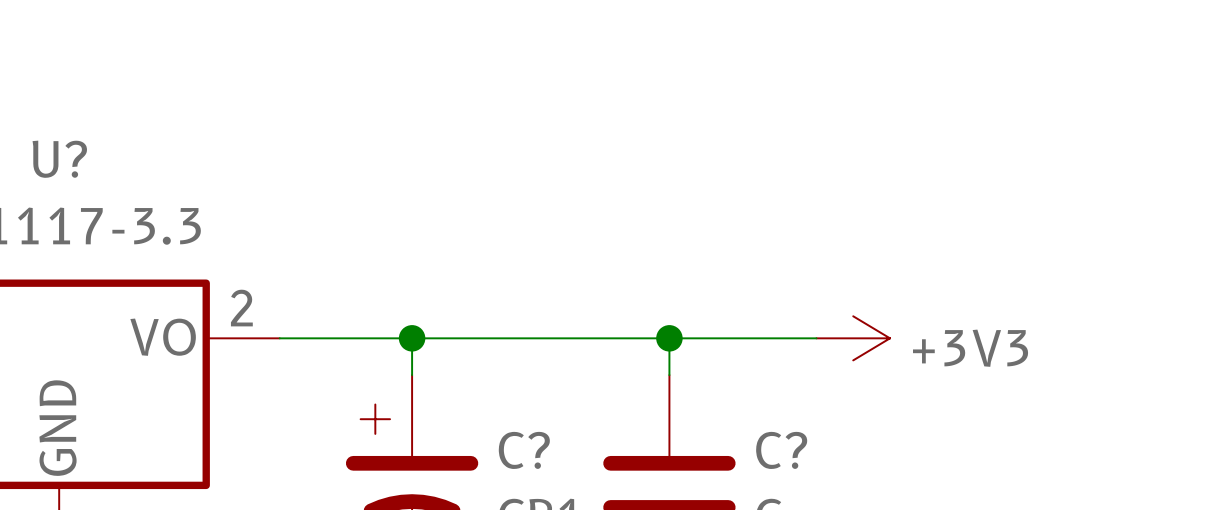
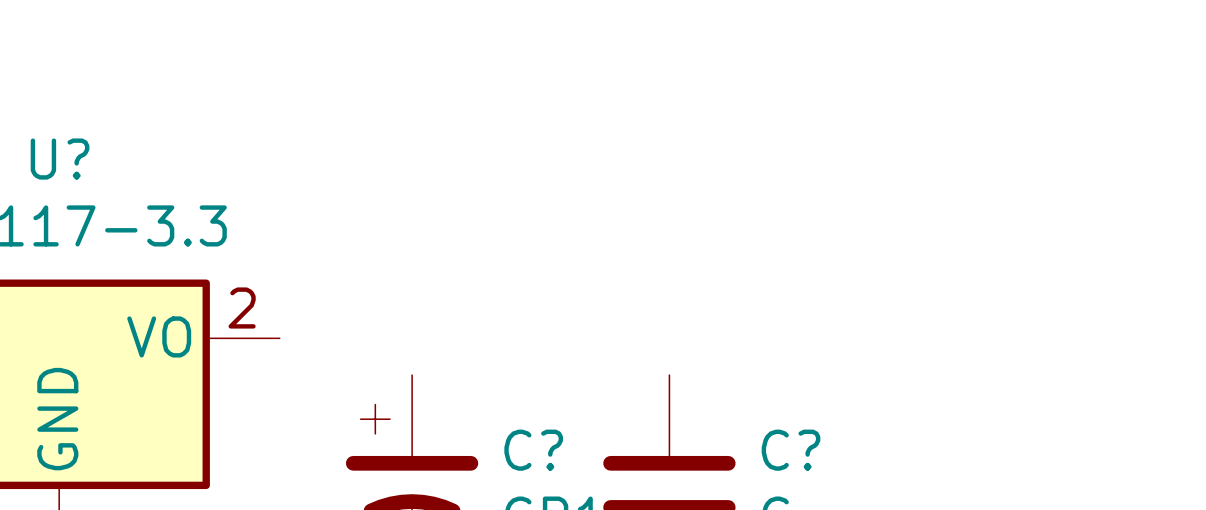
wire: (279, 338) (816, 338) -> none
wire: (412, 338) (412, 375) -> none
junction: (412, 338) -> none
wire: (669, 338) (669, 375) -> none
junction: (669, 338) -> none
power symbol: +3V3 (853, 338) -> none

